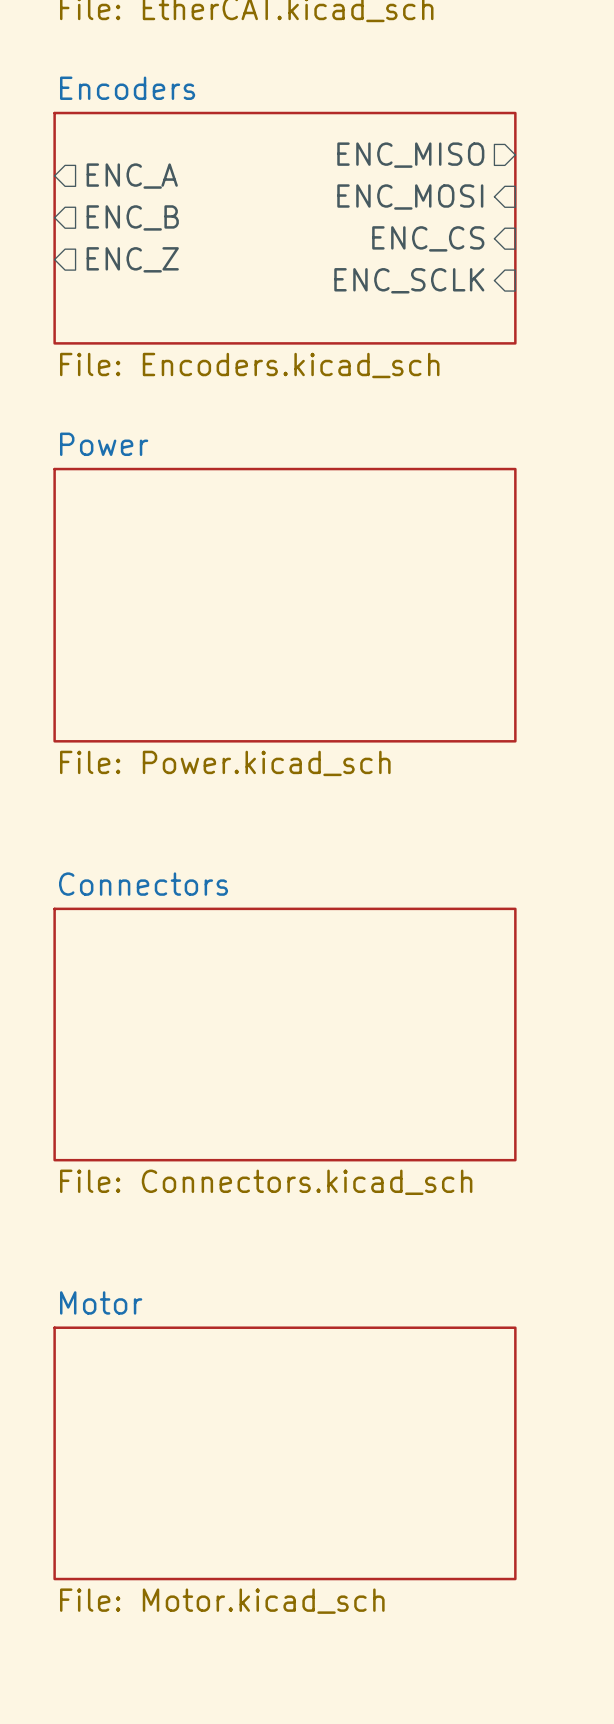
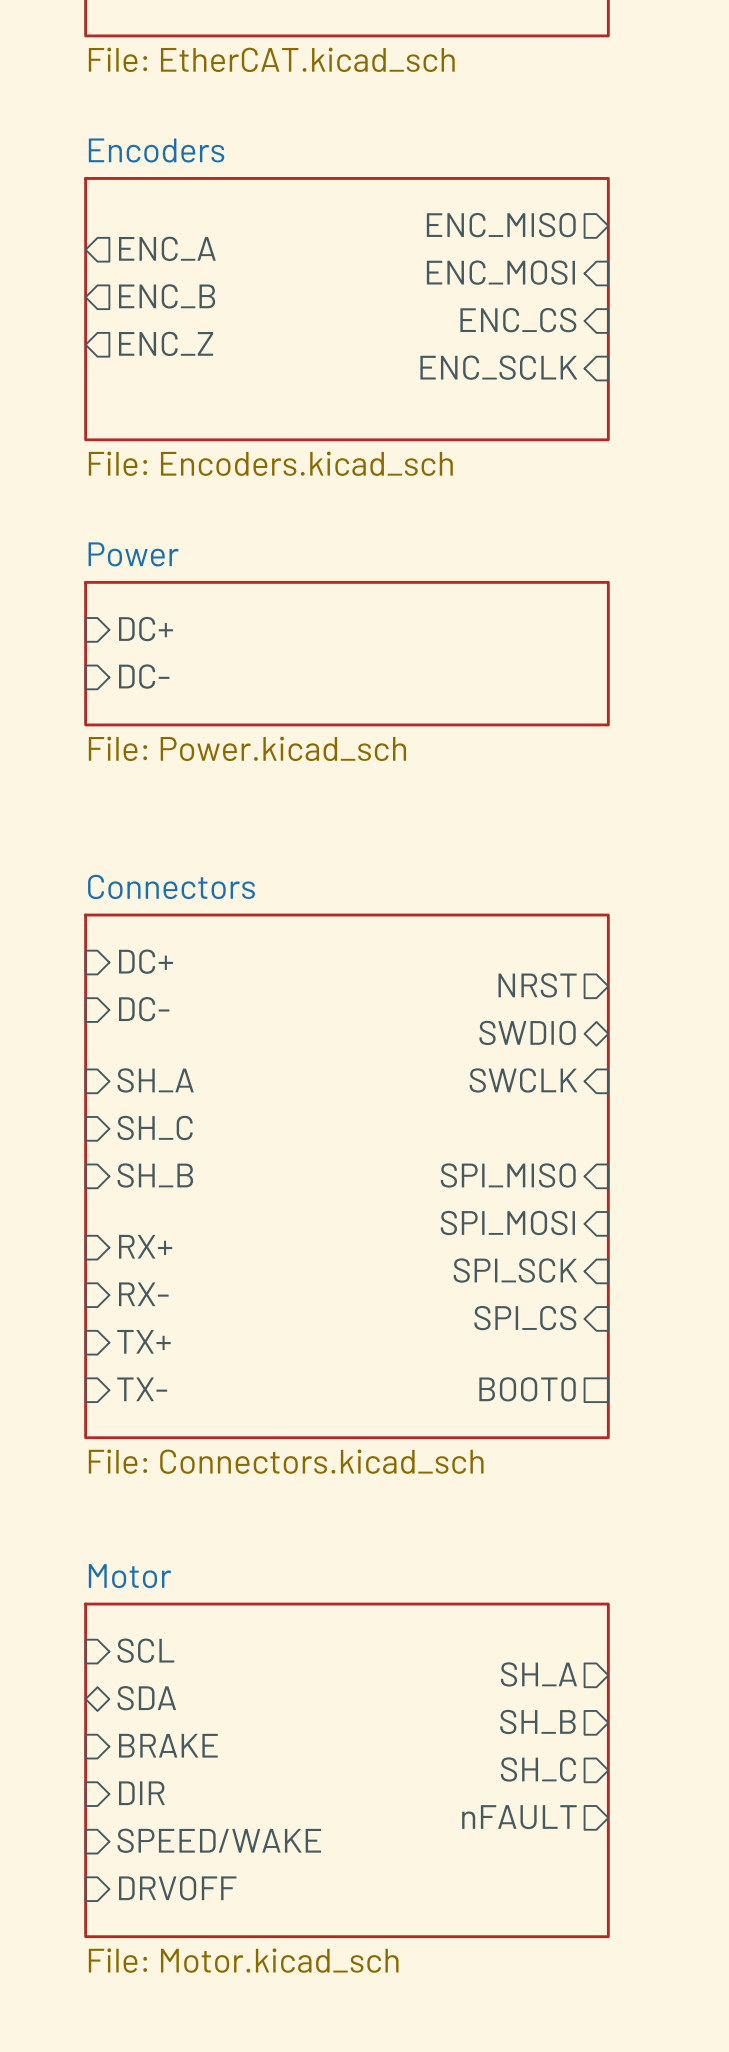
sheet pin: none -> DC+ (146, 629)
sheet Power: none -> File: Power.kicad_sch (346, 653)
sheet pin: none -> DC- (144, 676)
sheet Power: File: Power.kicad_sch (284, 605) -> none
sheet pin: none -> DC+ (146, 961)
sheet pin: none -> NRST (537, 985)
sheet pin: none -> DC- (144, 1009)
sheet pin: none -> SWDIO (527, 1032)
sheet pin: none -> SWCLK (523, 1080)
sheet pin: none -> SH_A (155, 1080)
sheet pin: none -> SH_C (155, 1127)
sheet pin: none -> SH_B (155, 1175)
sheet Connectors: none -> File: Connectors.kicad_sch (346, 1176)
sheet pin: none -> SPI_MISO (508, 1175)
sheet Connectors: File: Connectors.kicad_sch (284, 1034) -> none
sheet pin: none -> SPI_MOSI (507, 1223)
sheet pin: none -> RX+ (145, 1246)
sheet pin: none -> SPI_SCK (515, 1270)
sheet pin: none -> RX- (143, 1294)
sheet pin: none -> SPI_CS (525, 1318)
sheet pin: none -> TX+ (144, 1341)
sheet pin: none -> TX- (142, 1389)
sheet pin: none -> BOOT0 (527, 1389)
sheet pin: none -> SCL (145, 1650)
sheet pin: none -> SH_A (538, 1674)
sheet pin: none -> SDA (146, 1698)
sheet Motor: File: Motor.kicad_sch (284, 1453) -> none
sheet pin: none -> SH_B (537, 1721)
sheet pin: none -> BRAKE (168, 1745)
sheet Motor: none -> File: Motor.kicad_sch (346, 1770)
sheet pin: none -> SH_C (538, 1769)
sheet pin: none -> DIR (141, 1793)
sheet pin: none -> nFAULT (519, 1817)
sheet pin: none -> SPEED/WAKE (219, 1840)
sheet pin: none -> DRVOFF (177, 1888)

